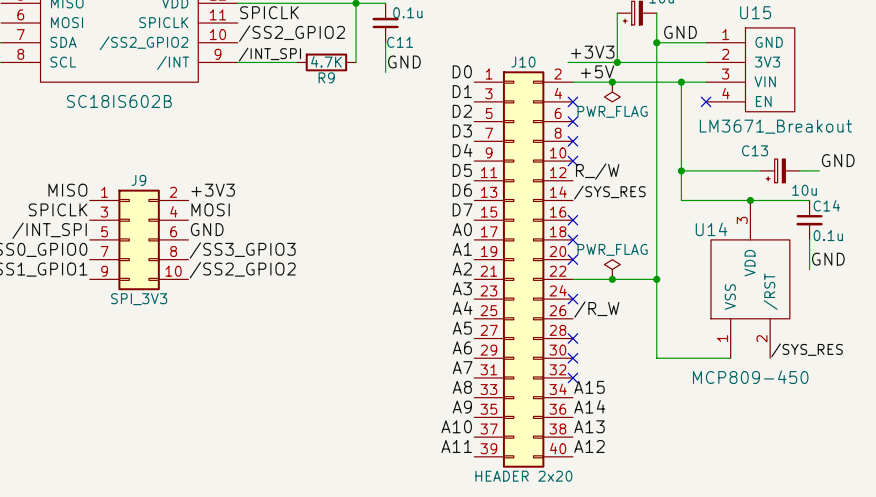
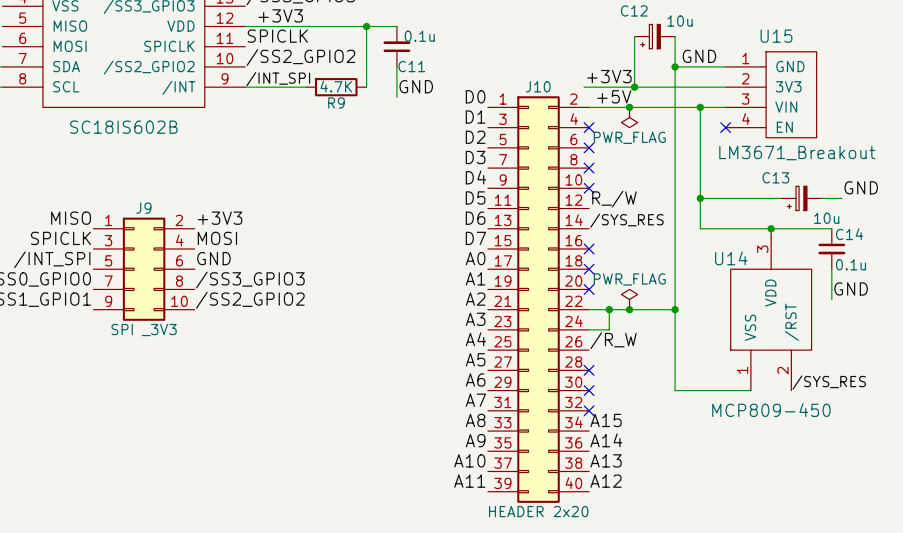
wire: none -> (609, 309) (609, 329) (589, 329)
junction: none -> (609, 309)
J9 value: SPI_3V3 (139, 299) -> SPI _3V3 (144, 330)
no-connect mark: (572, 299) -> none

